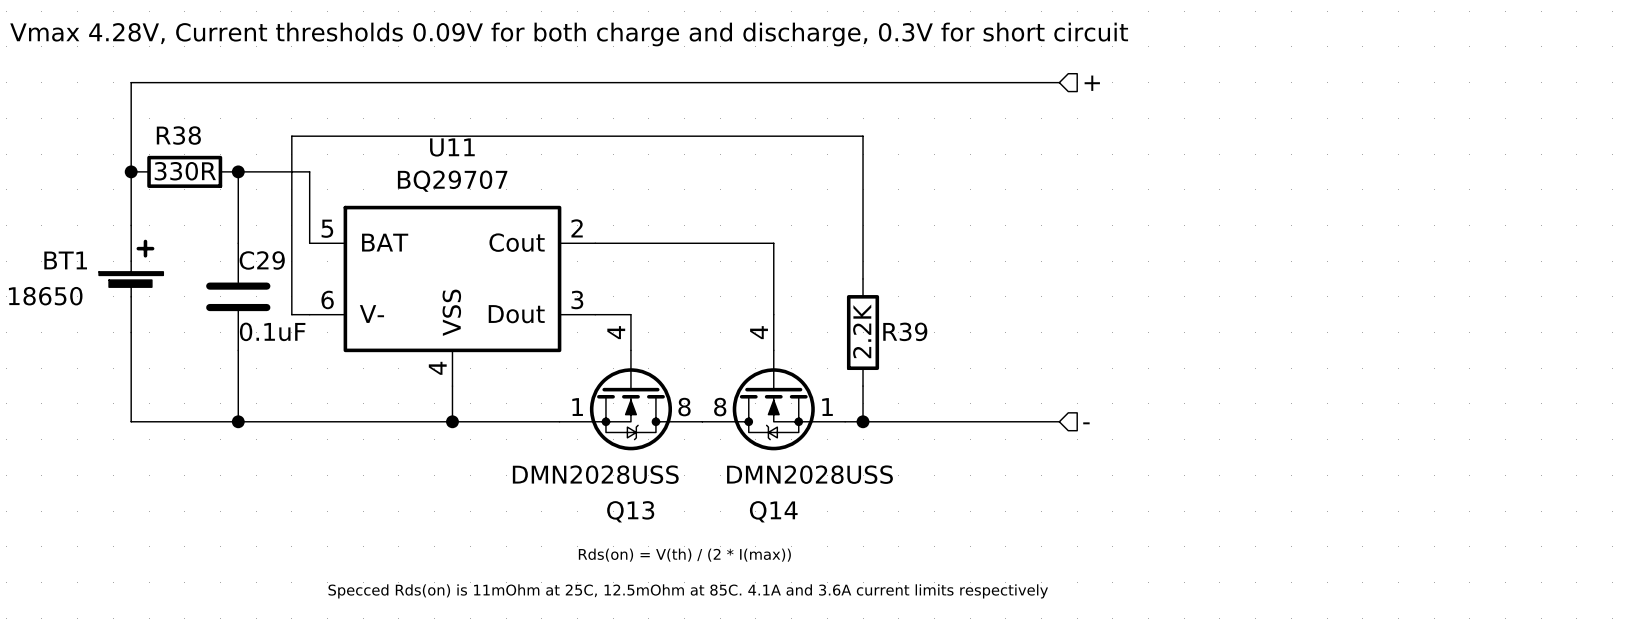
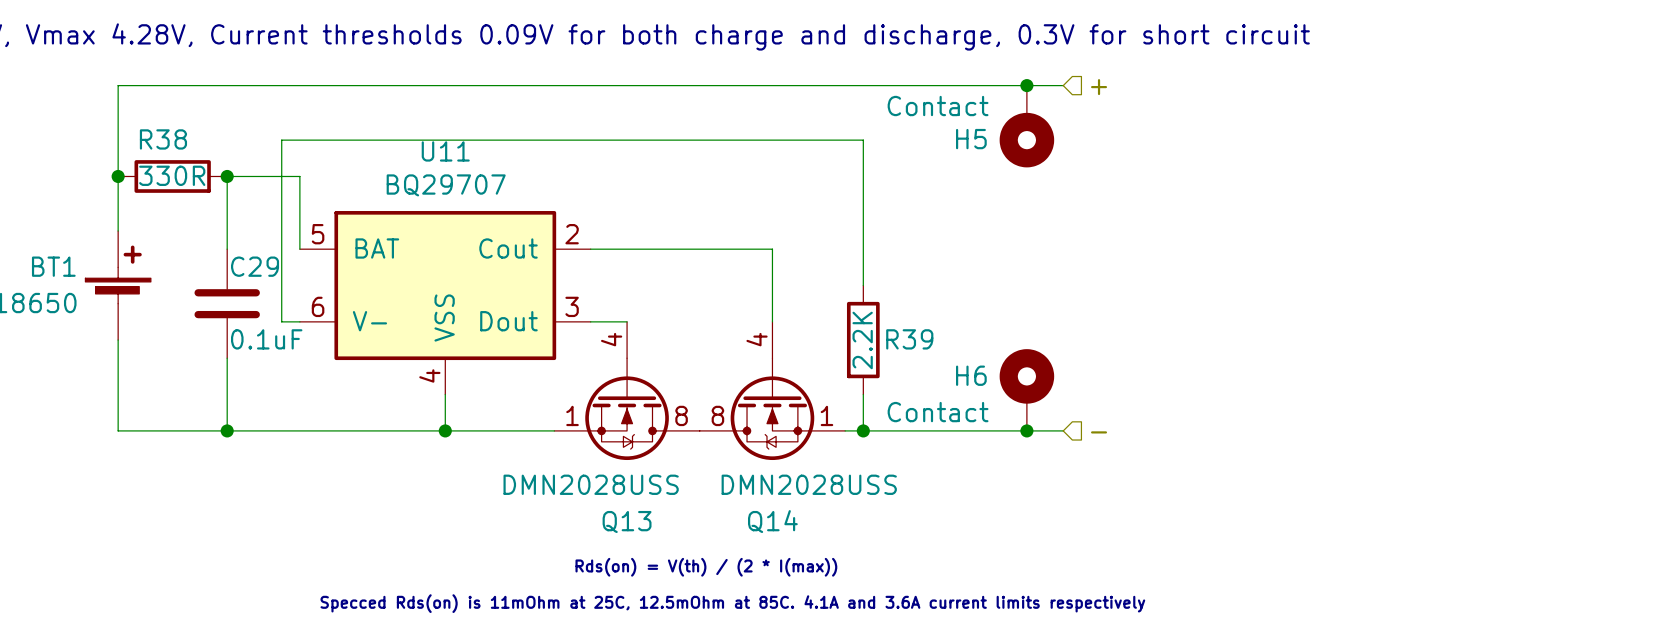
junction: none -> (1026, 85)
H5: none -> Contact (1026, 126)
H6: none -> Contact (1026, 390)
junction: none -> (1026, 430)

